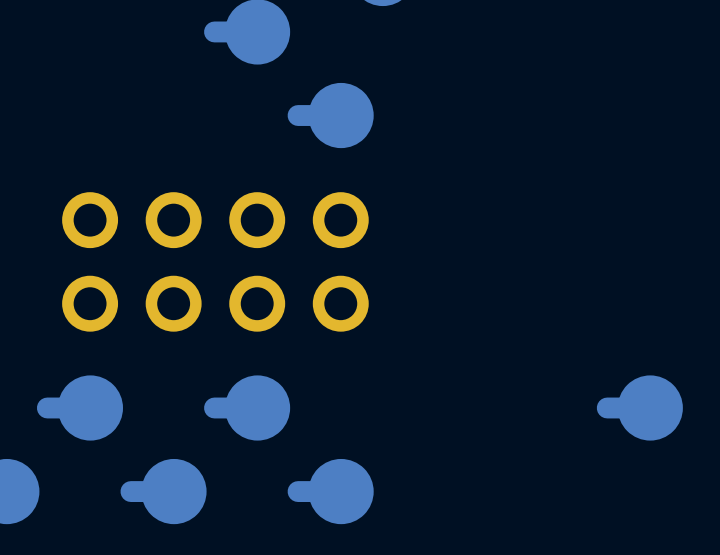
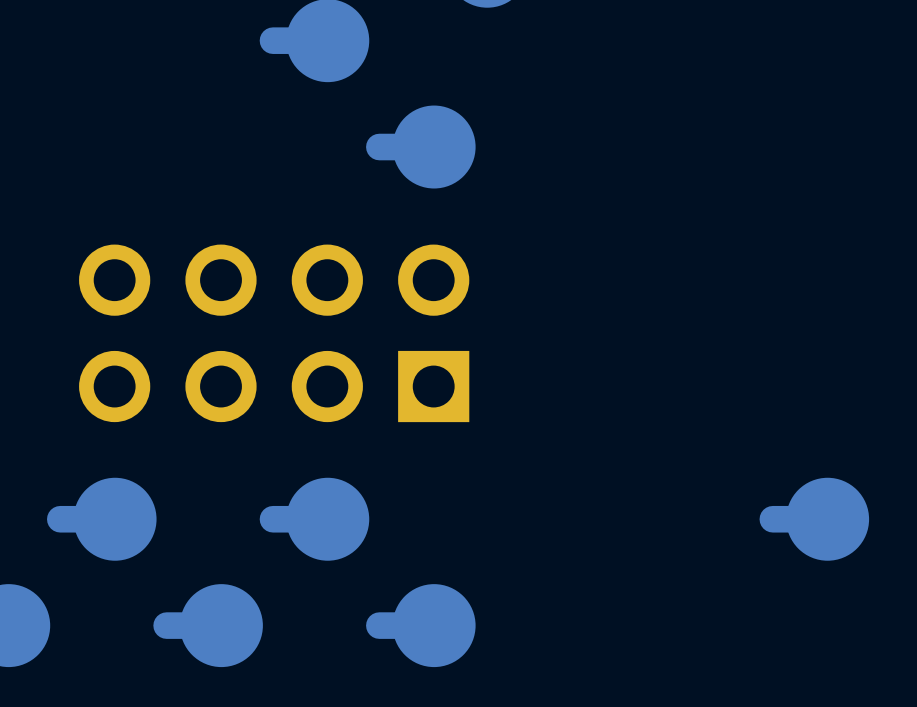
part footprint: [62, 192, 369, 332] -> [79, 244, 470, 423]

